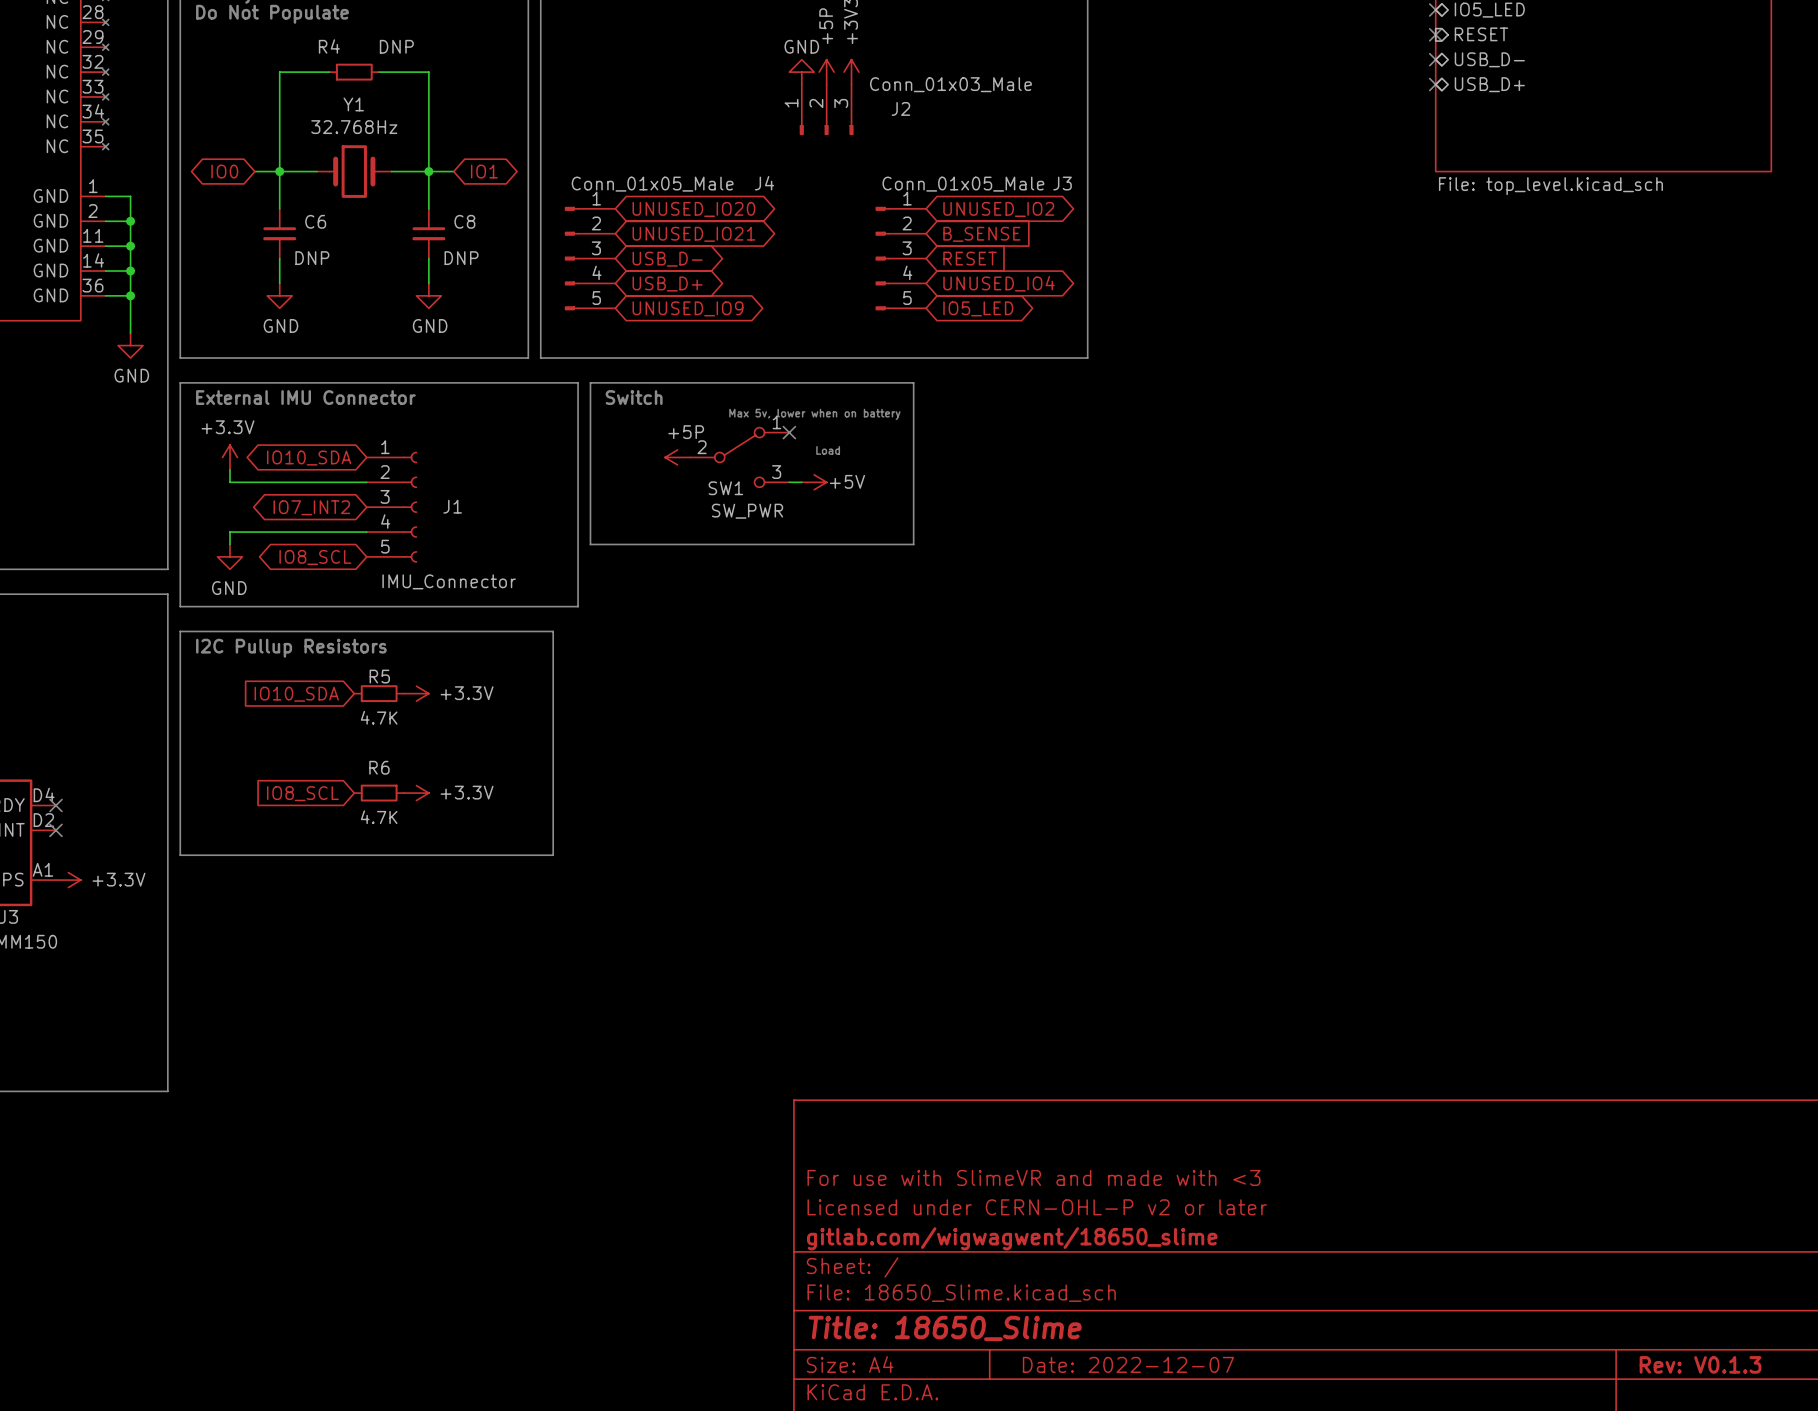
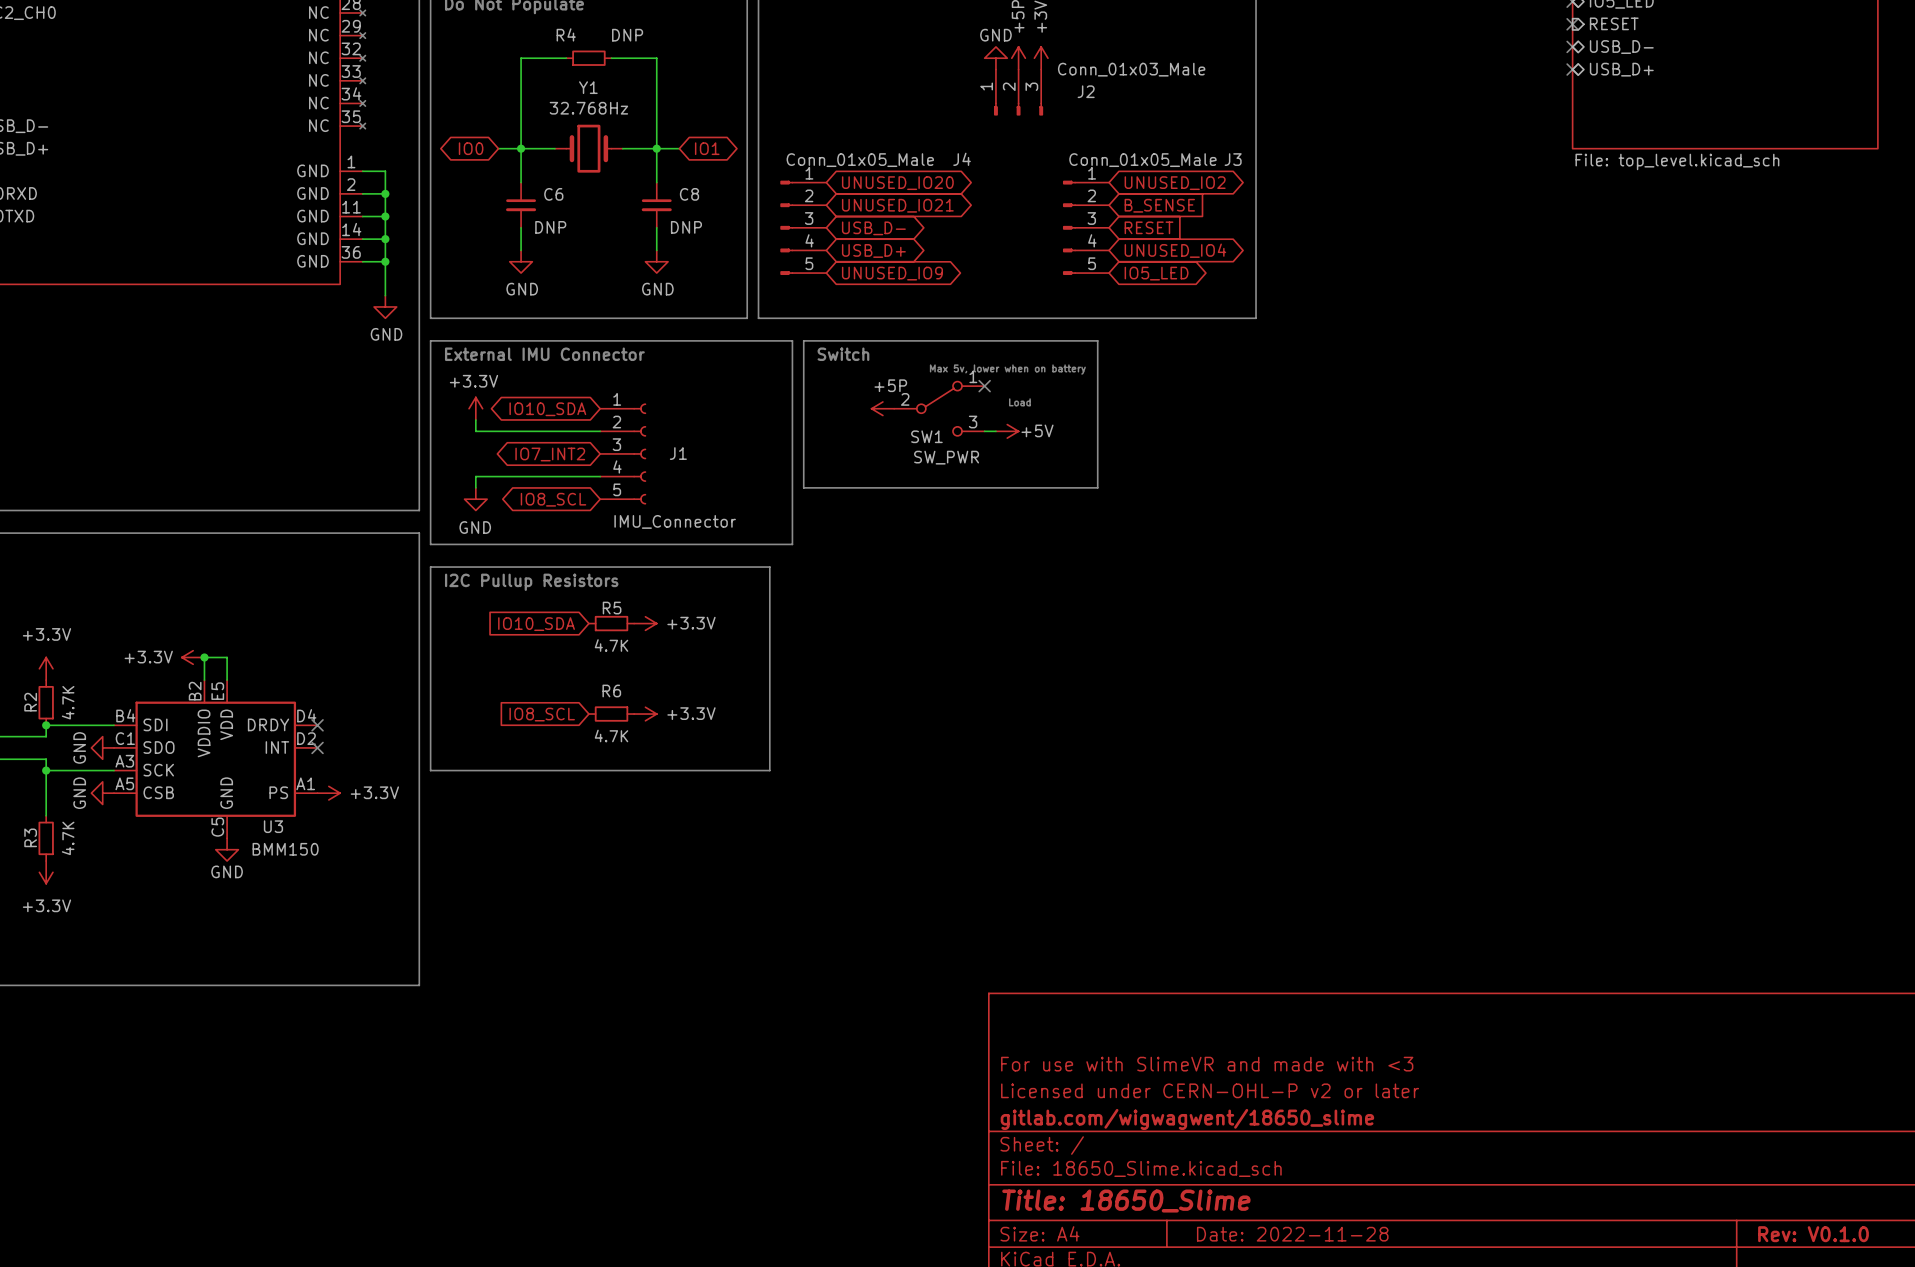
title block: Date: 2022-12-07 (1128, 1364) -> Date: 2022-11-28 (1292, 1234)
title block: Rev: V0.1.3 (1700, 1364) -> Rev: V0.1.0 (1813, 1234)

